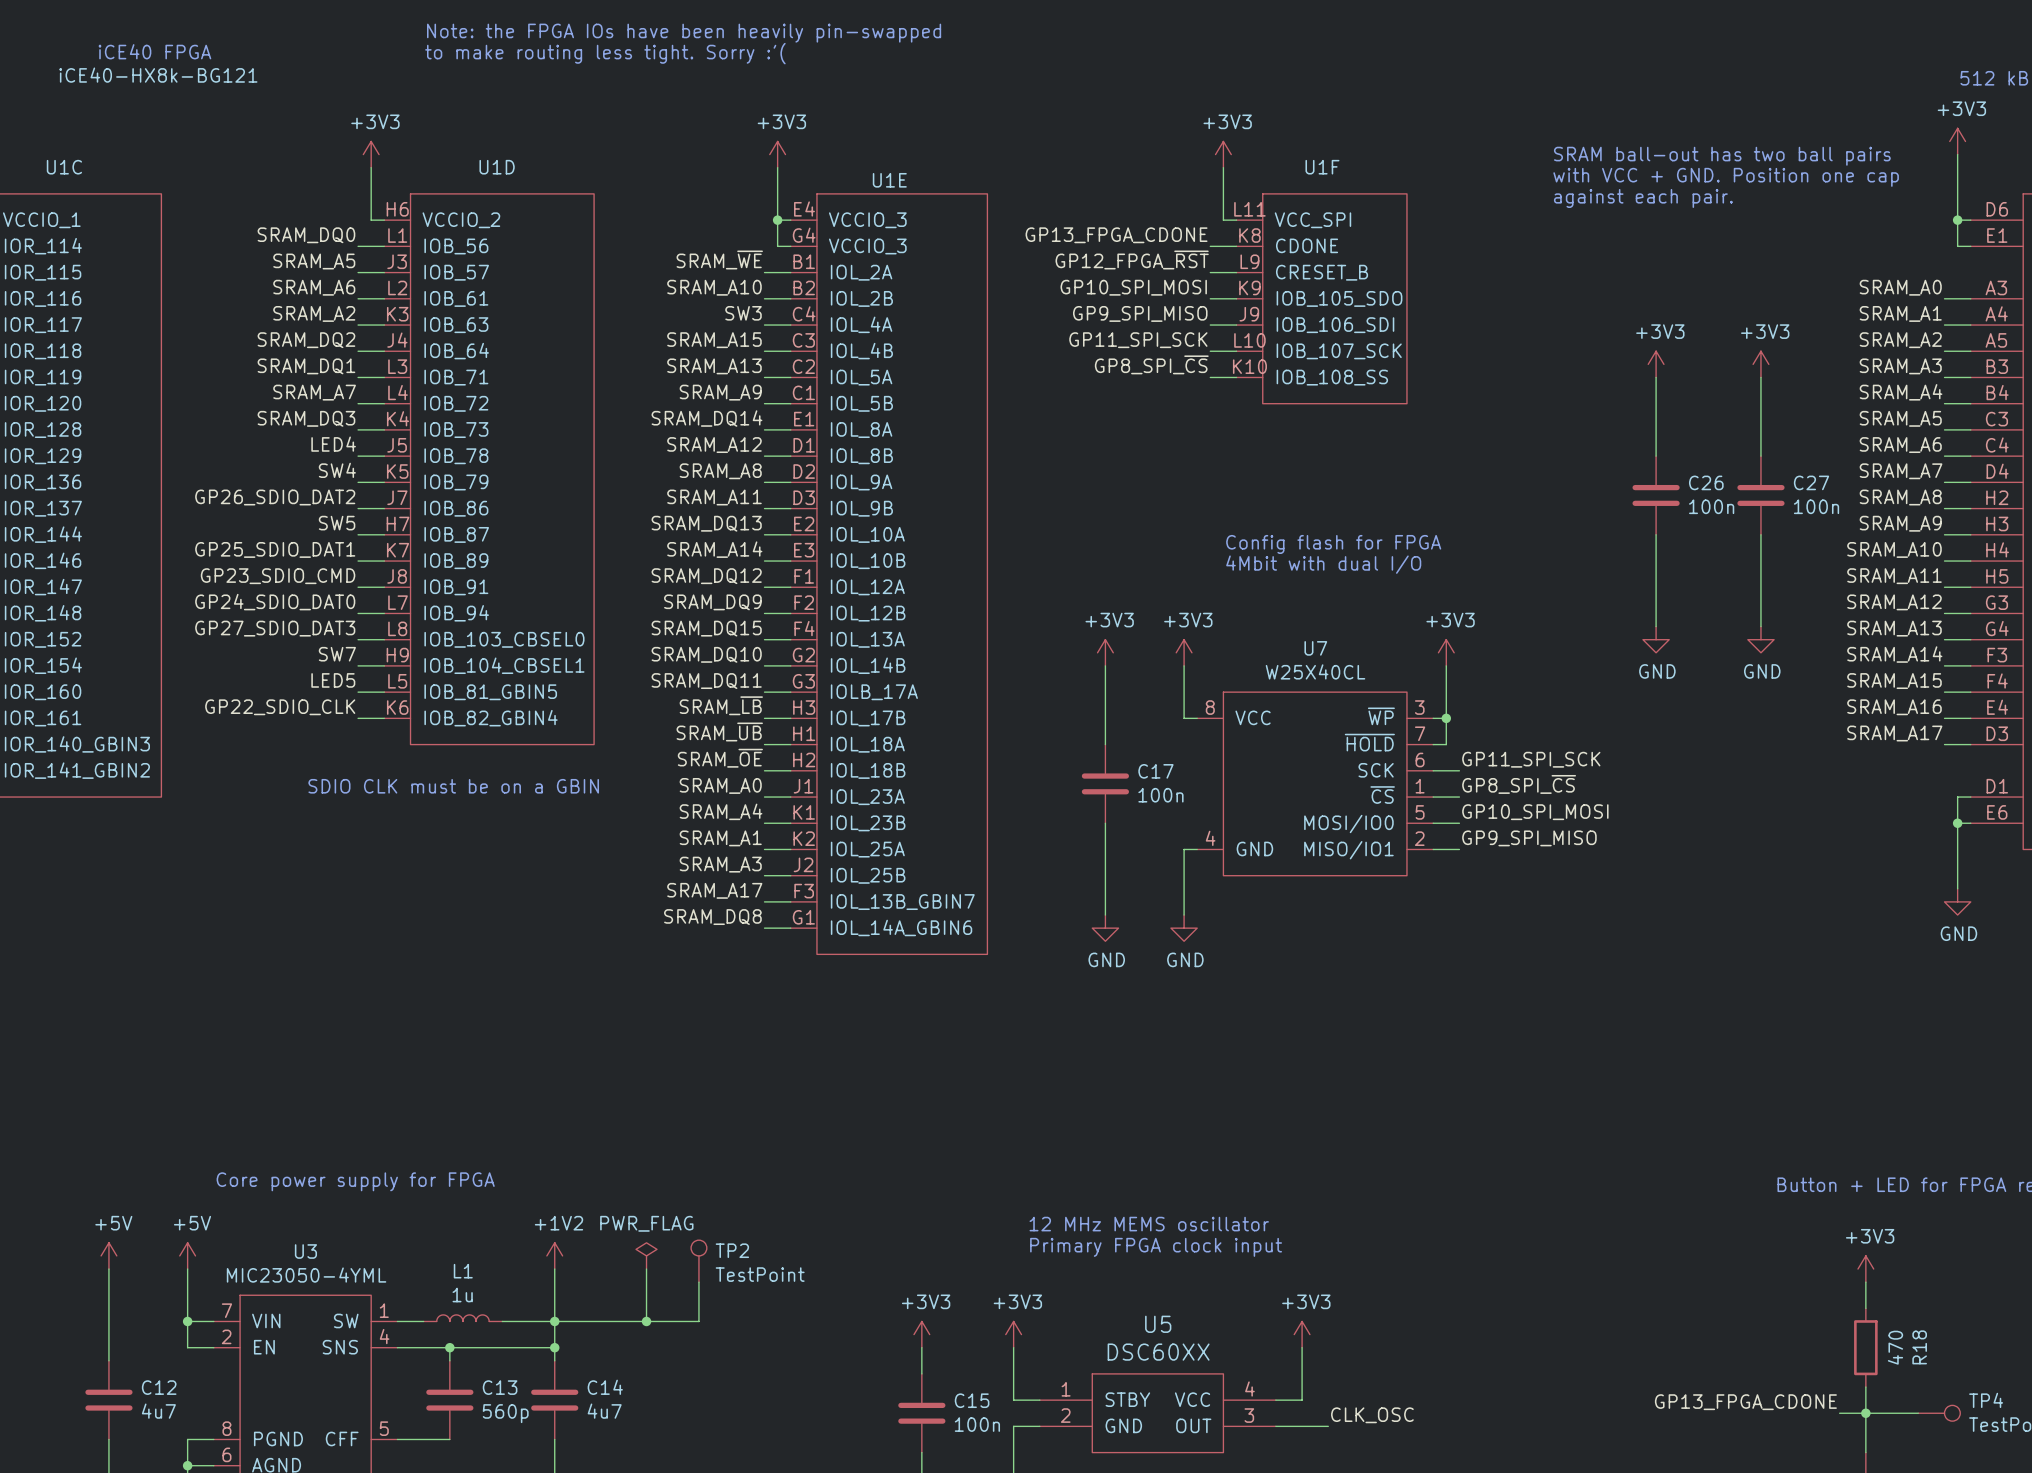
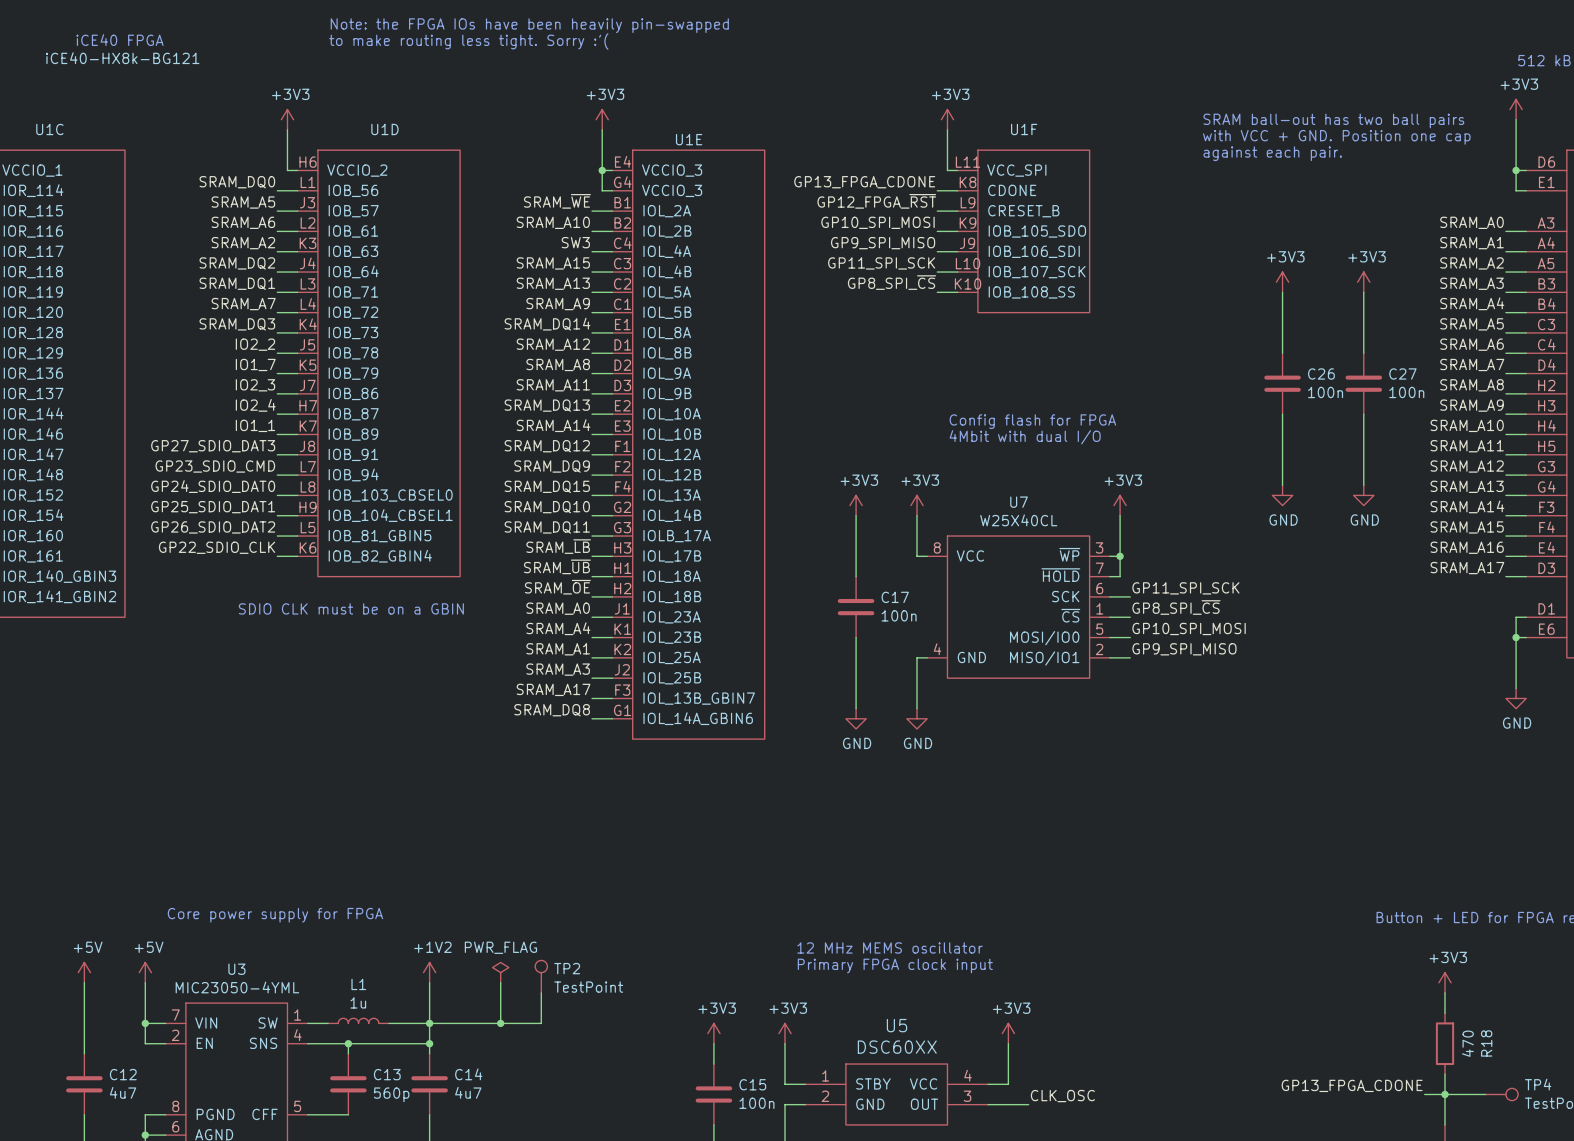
label: LED4 (333, 444) -> IO2_2 (255, 344)
label: SW4 (337, 470) -> IO1_7 (255, 364)
label: GP26_SDIO_DAT2 (275, 497) -> IO2_3 (255, 385)
label: SW5 (337, 523) -> IO2_4 (255, 405)
label: GP25_SDIO_DAT1 (275, 549) -> IO1_1 (255, 425)
label: GP23_SDIO_CMD (278, 576) -> GP27_SDIO_DAT3 (213, 446)
label: GP24_SDIO_DAT0 (275, 602) -> GP23_SDIO_CMD (215, 466)
label: GP27_SDIO_DAT3 (275, 628) -> GP24_SDIO_DAT0 (213, 486)
label: SW7 (337, 654) -> GP25_SDIO_DAT1 (213, 507)
label: LED5 (333, 680) -> GP26_SDIO_DAT2 (213, 527)

